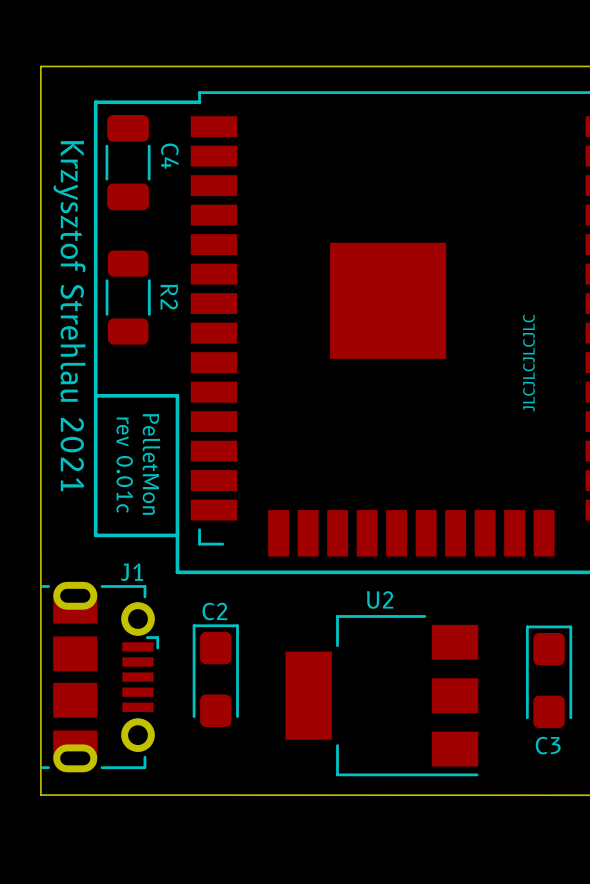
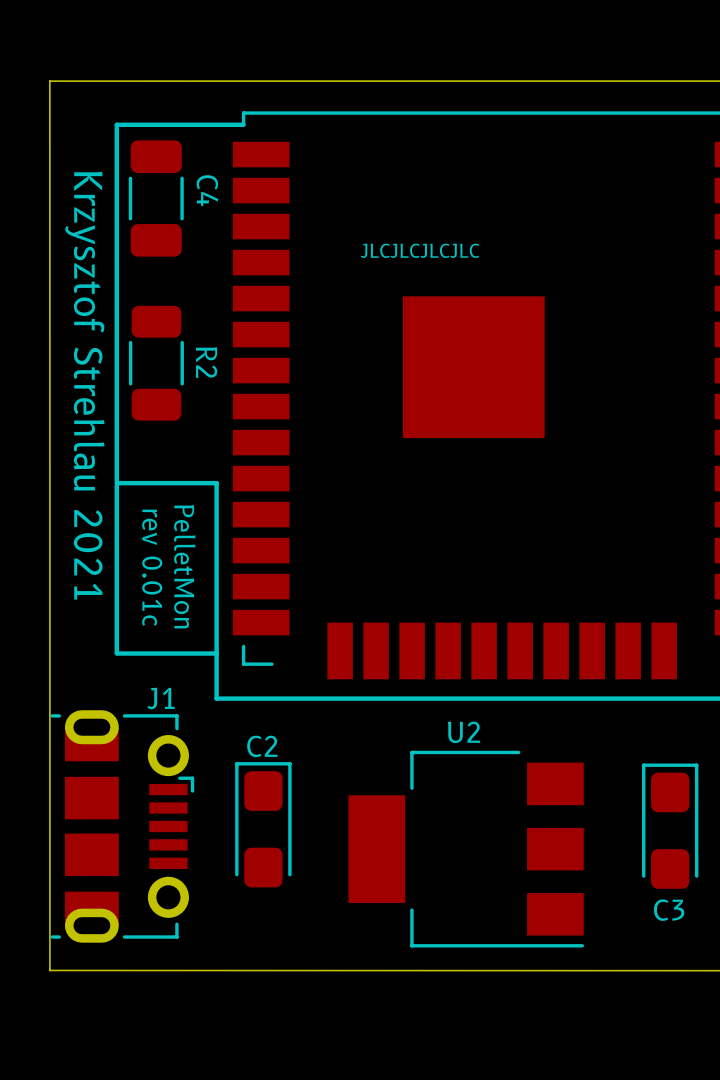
text rotation: 0° (528, 363) -> 90° clockwise (420, 250)
text position: JLCJLCJLCJLC (528, 363) -> JLCJLCJLCJLC (420, 250)

